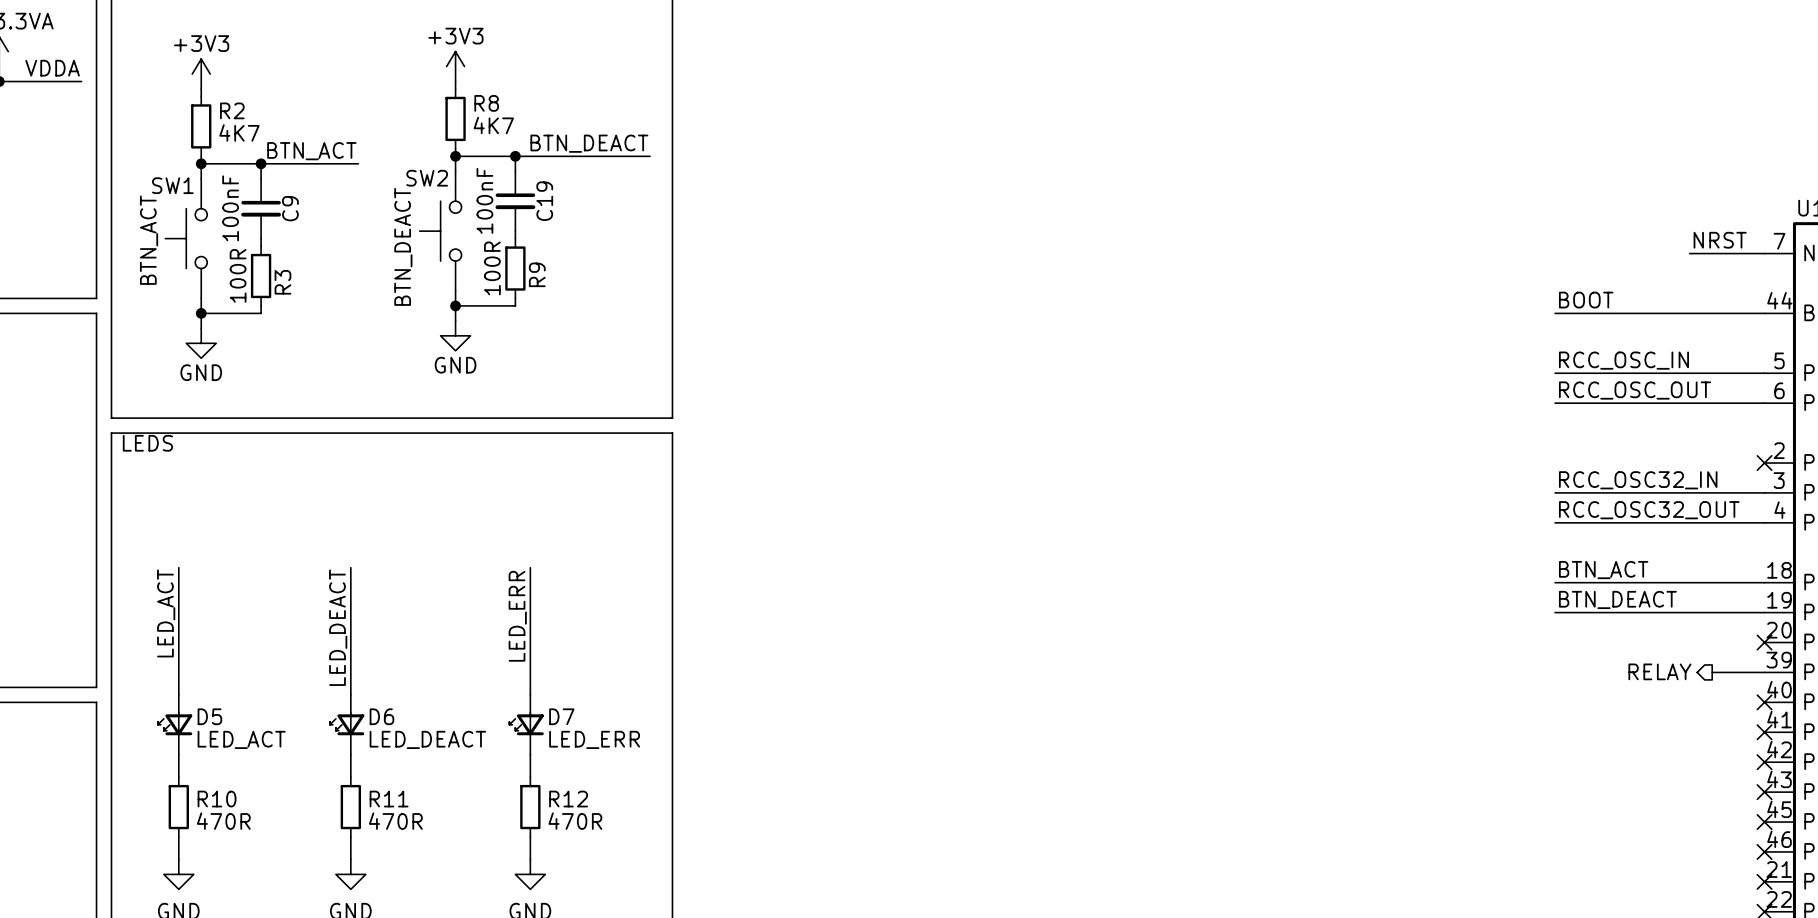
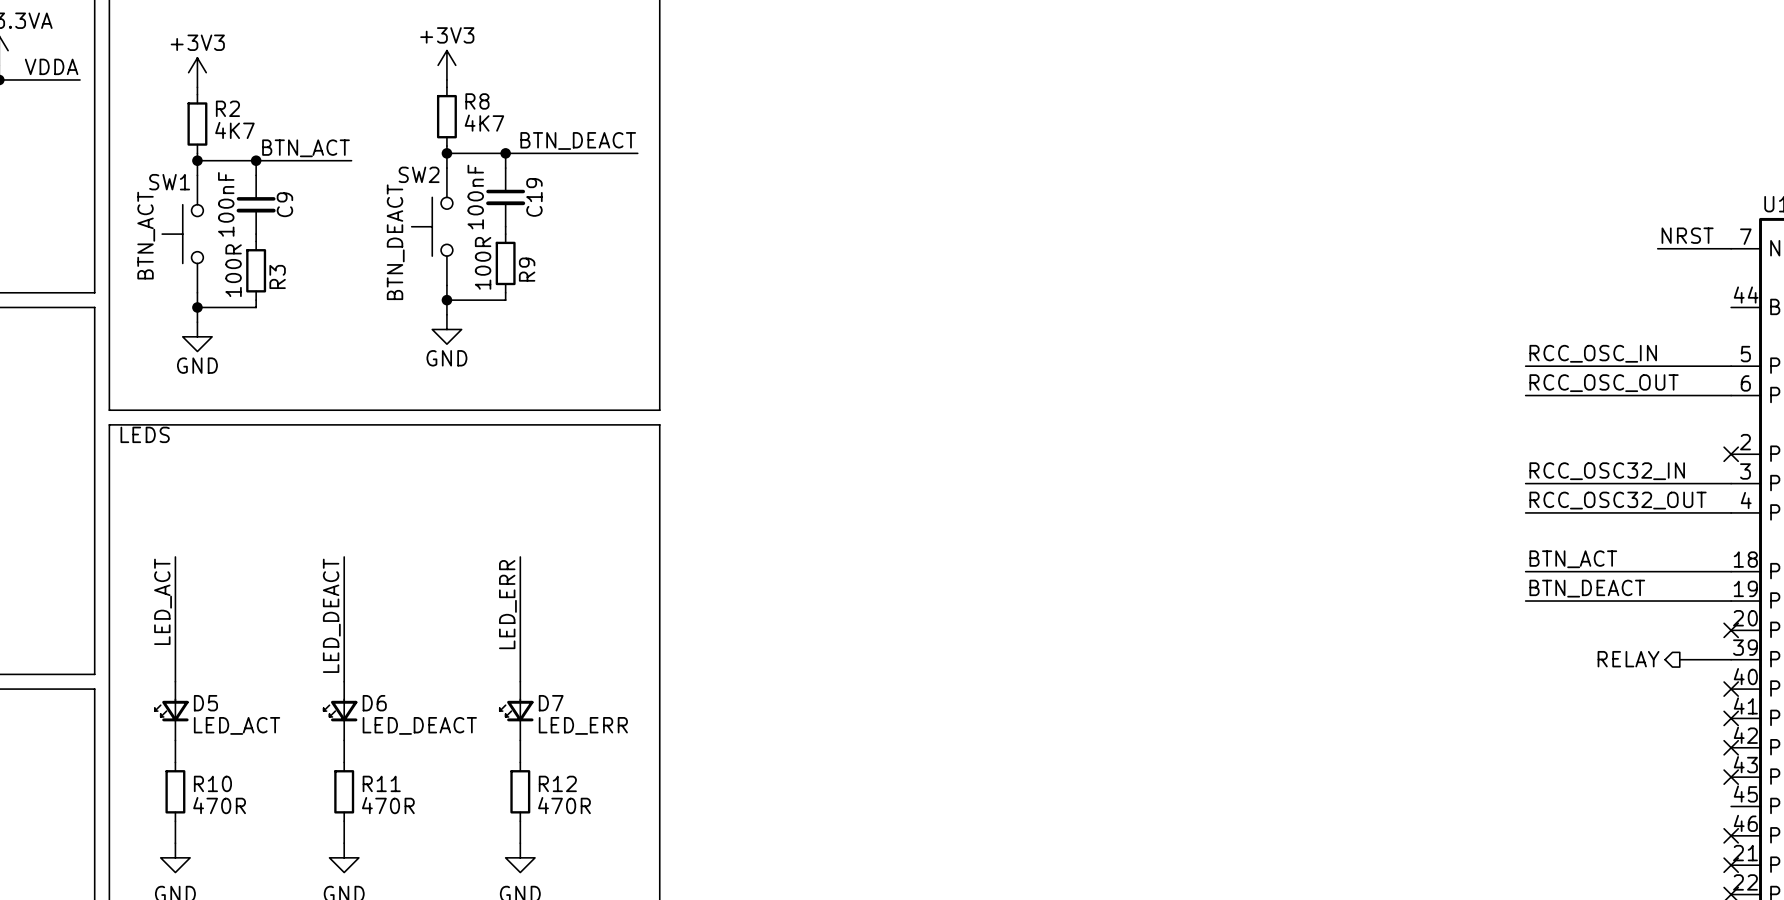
label: BOOT (1586, 300) -> none
wire: (1555, 313) (1764, 313) -> none
no-connect mark: (1764, 822) -> none

